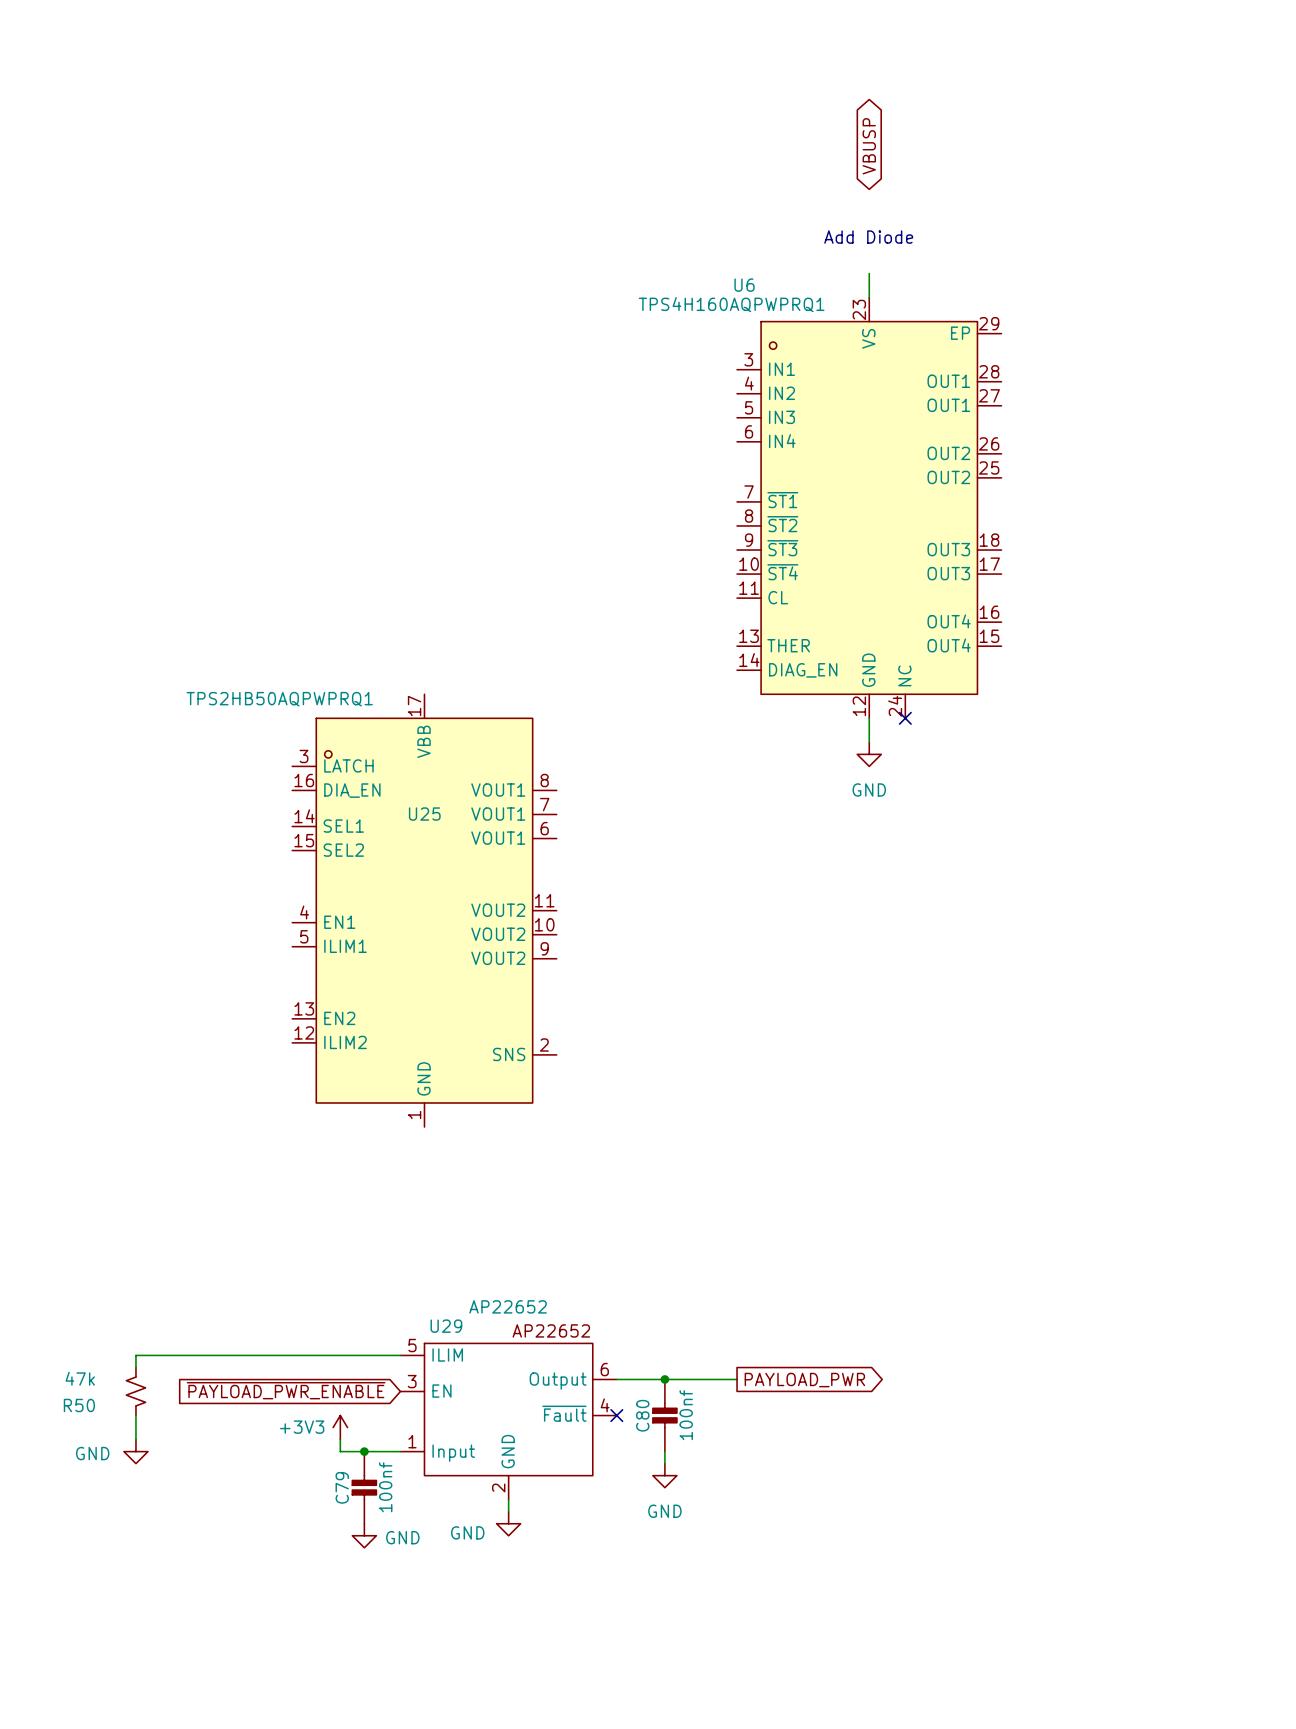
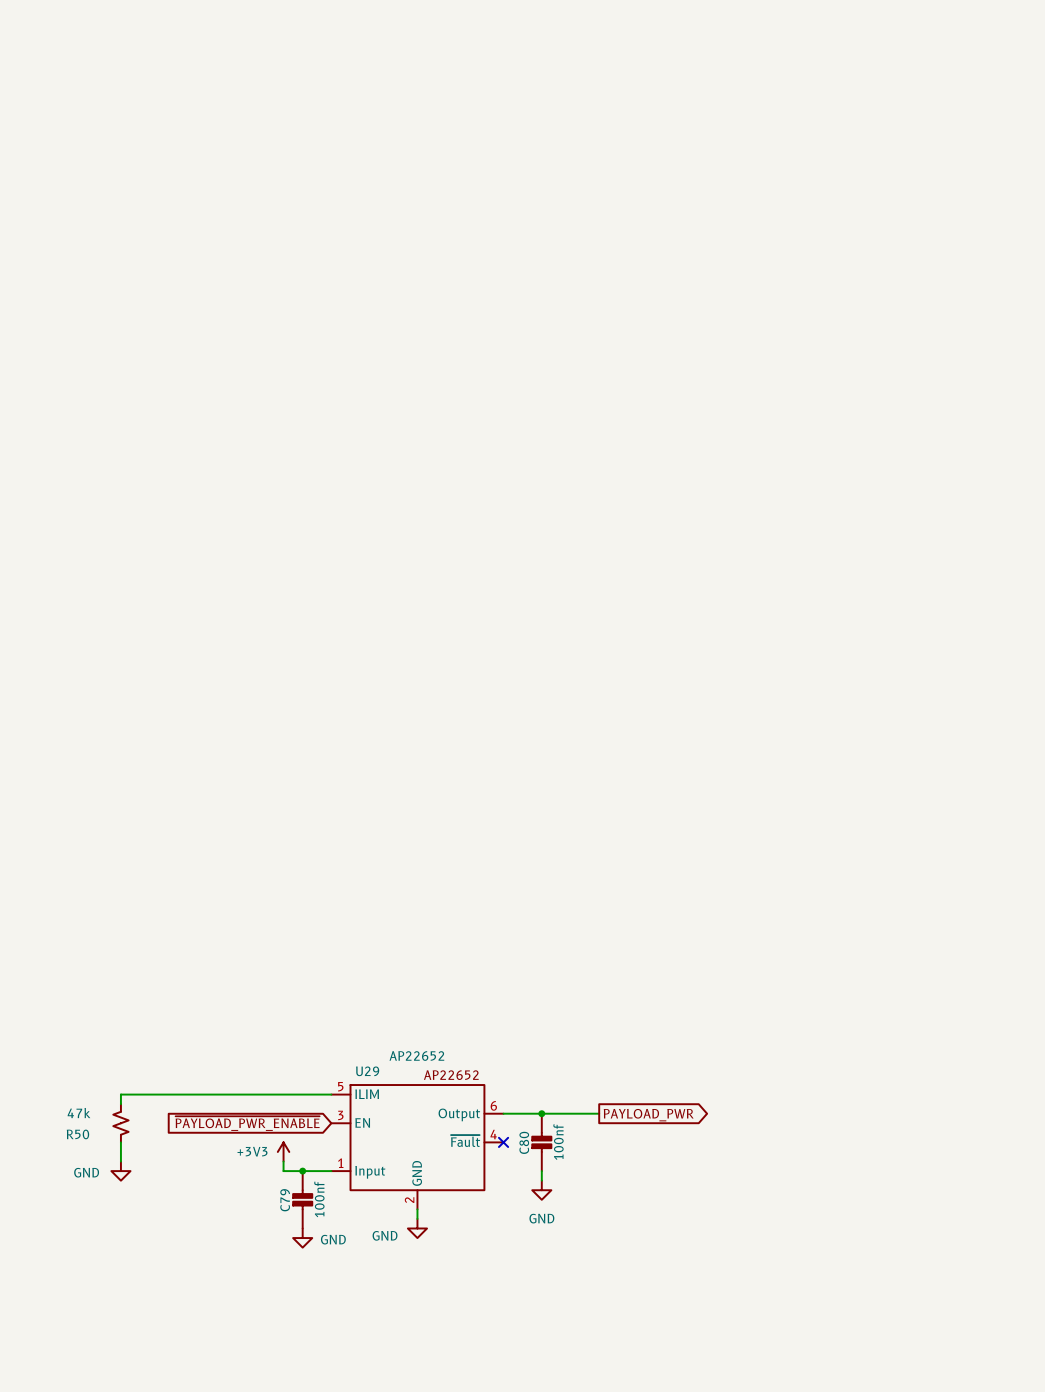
global label: VBUSP (869, 146) -> none
text: Add Diode (868, 237) -> none
wire: (869, 273) (869, 297) -> none
U6: TPS4H160AQPWPRQ1 (869, 507) -> none
wire: (869, 718) (869, 742) -> none
no-connect mark: (905, 718) -> none
power symbol: GND (869, 754) -> none
U25: TPS2HB50AQPWPRQ1 (424, 910) -> none

